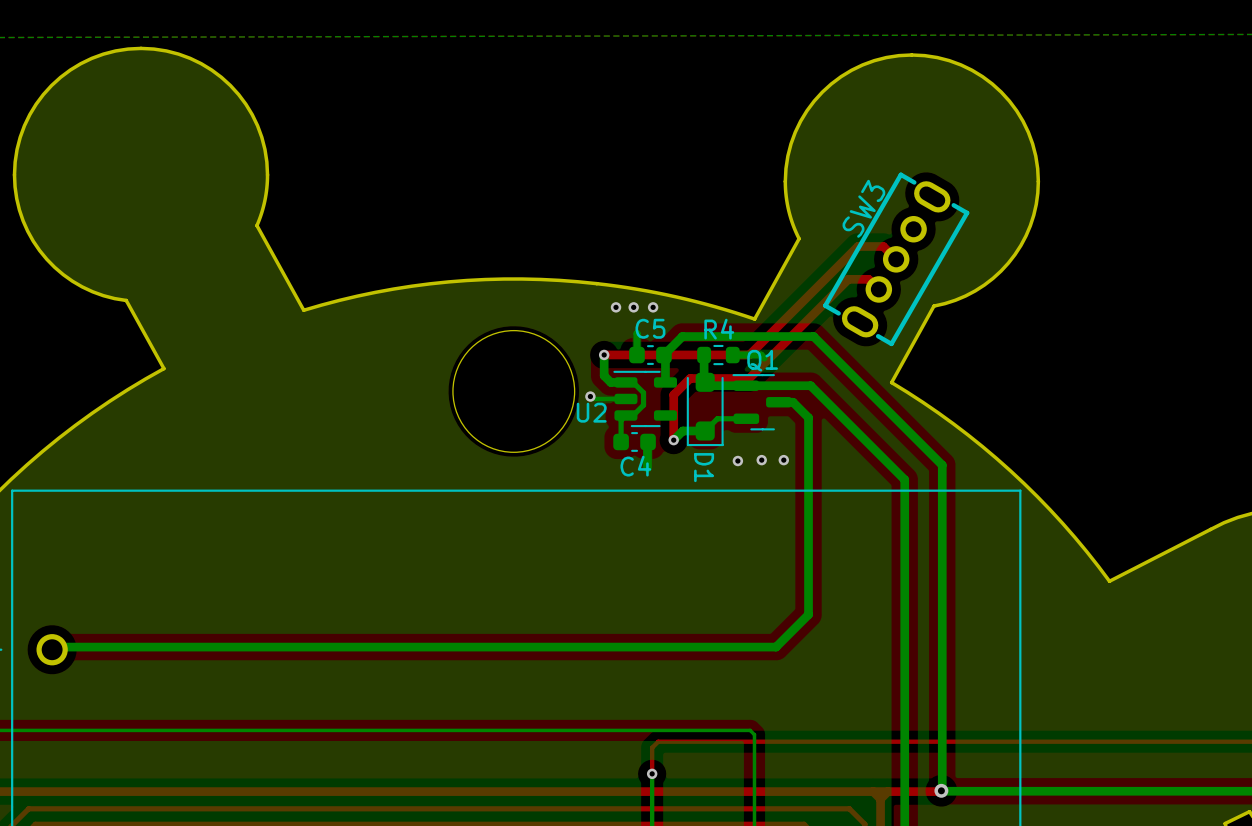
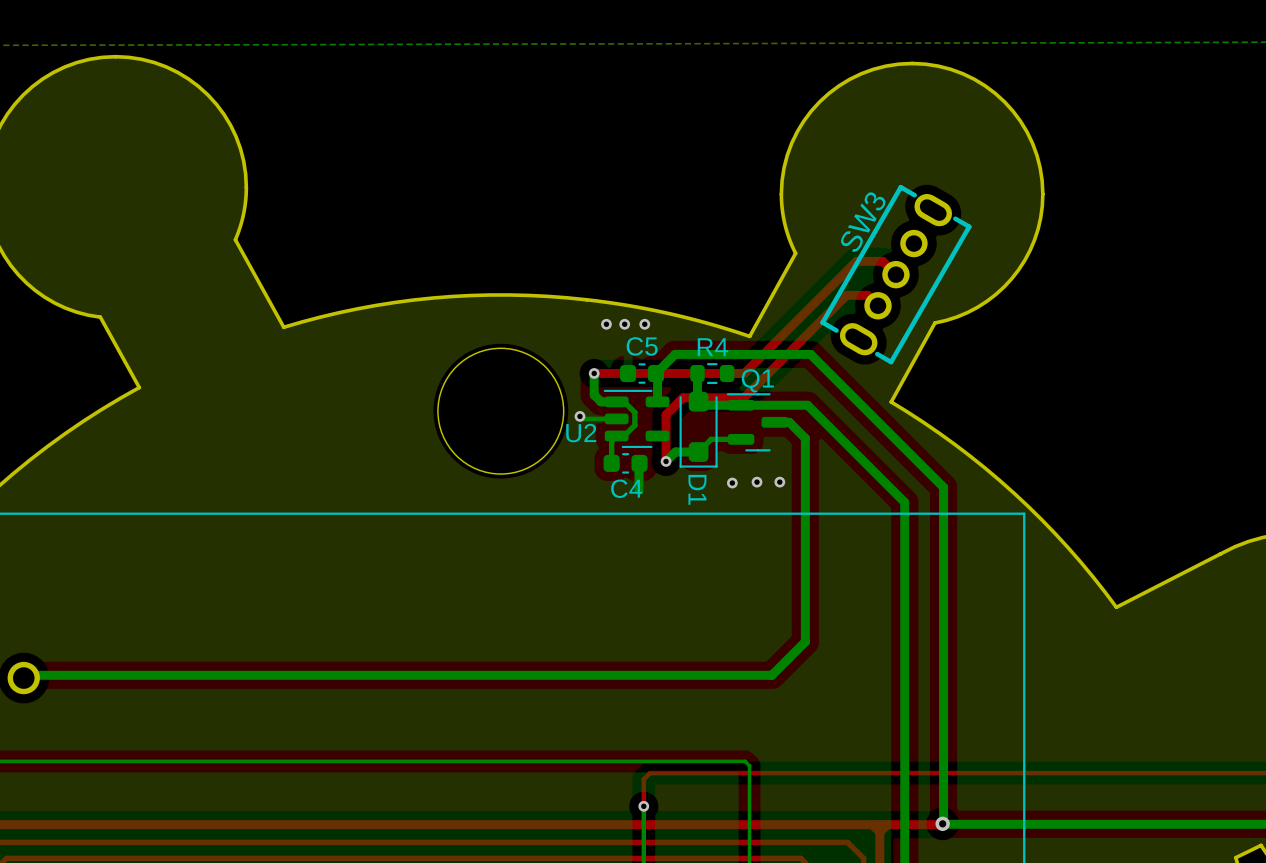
bottom track: (636, 333) (636, 355) -> none
bottom track: (732, 355) (761, 355) (764, 358) -> none

